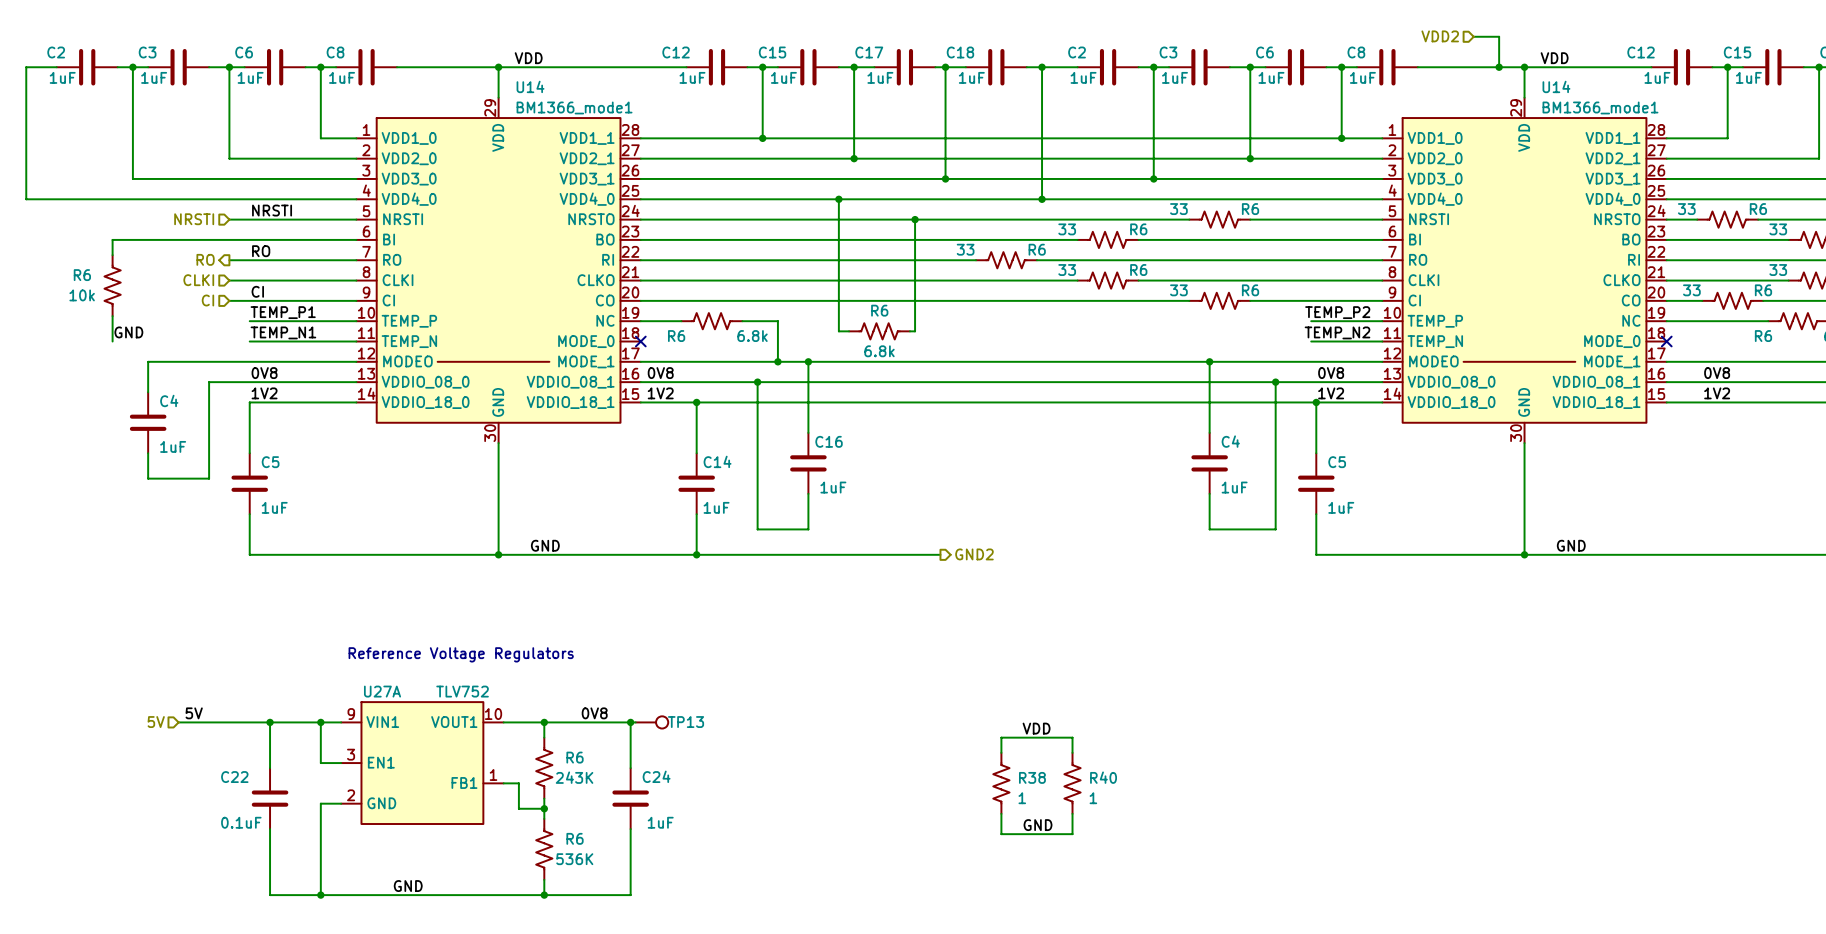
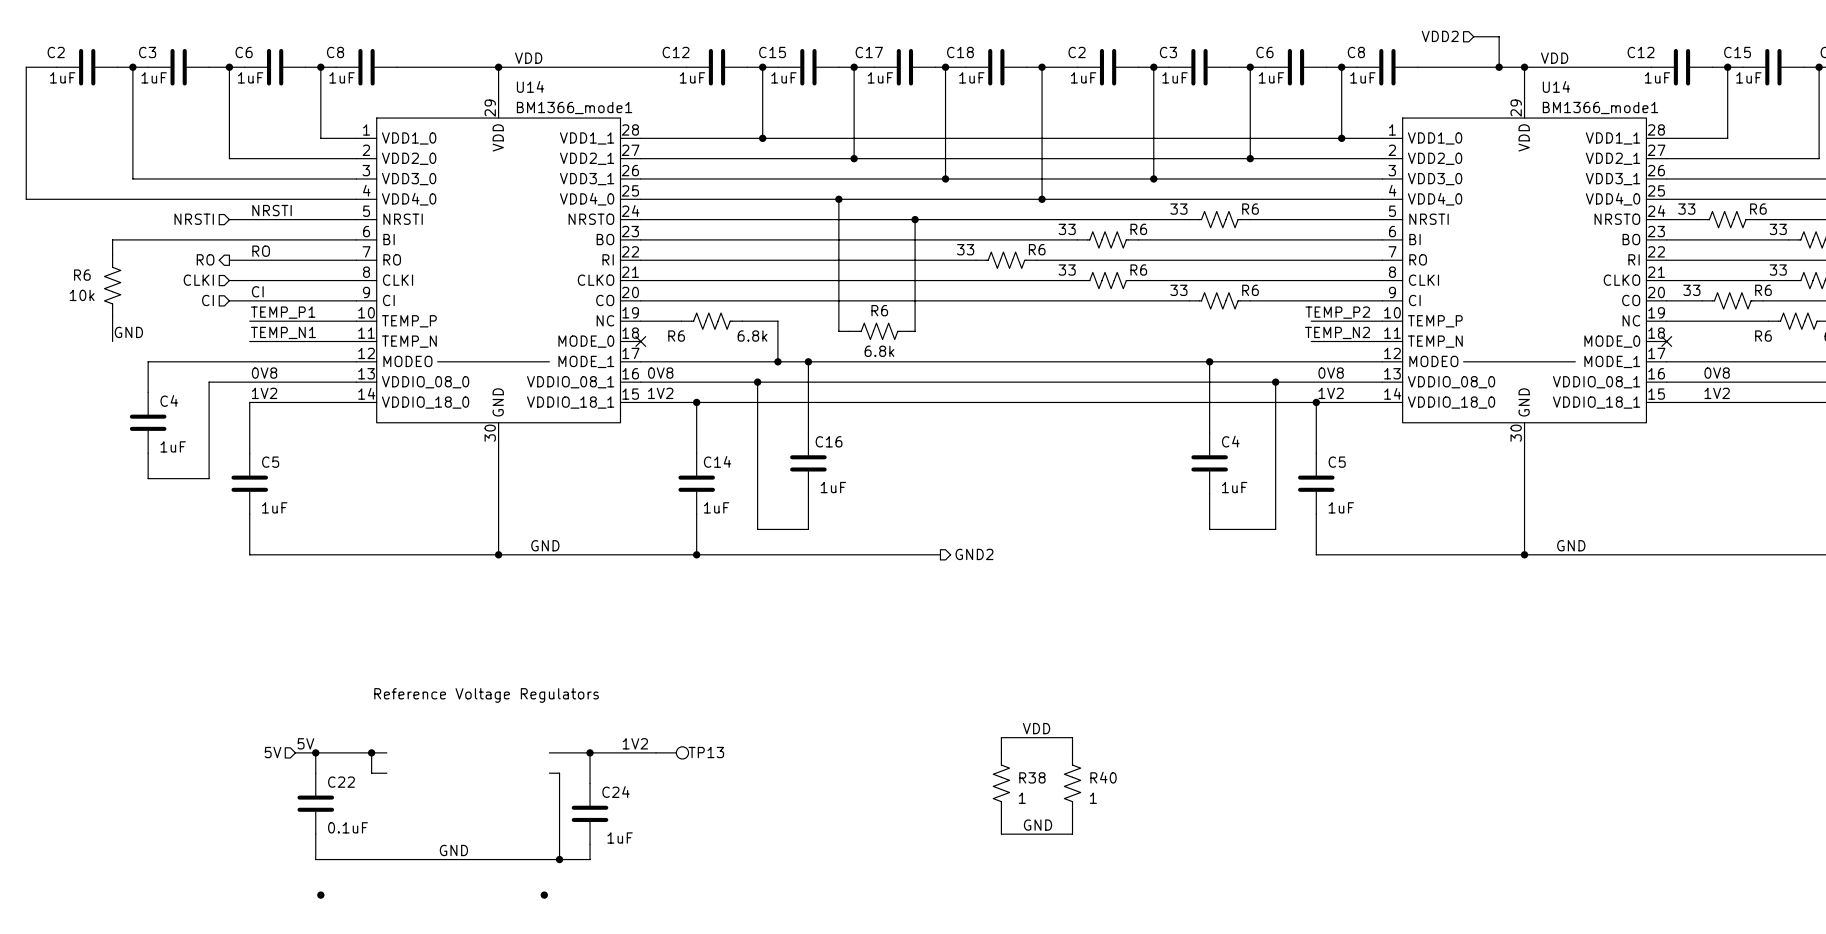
text position: Reference Voltage Regulators (461, 654) -> Reference Voltage Regulators (486, 695)
label position: 5V (194, 713) -> 5V (305, 743)
label: 0V8 (594, 713) -> none
hierarchical label position: 5V (156, 722) -> 5V (273, 752)
wire: (178, 722) (341, 722) -> none
wire: (270, 722) (270, 768) -> none
junction: (270, 722) -> none
wire: (320, 722) (320, 763) (341, 763) -> none
junction: (320, 722) -> none
wire: (503, 722) (635, 722) -> none
wire: (544, 722) (544, 737) -> none
junction: (544, 722) -> none
wire: (630, 722) (630, 768) -> none
junction: (630, 722) -> none
TP13 position: (651, 722) -> (672, 752)
label: none -> 1V2 (635, 743)
wire: none -> (295, 752) (386, 752)
wire: none -> (315, 752) (315, 773)
junction: none -> (315, 752)
junction: none -> (371, 752)
wire: none -> (549, 752) (656, 752)
wire: none -> (590, 752) (590, 783)
junction: none -> (590, 752)
U27A: TLV752 (422, 763) -> none
R6: 243K (544, 768) -> none
wire: none -> (549, 773) (559, 773) (559, 859)
C22 name position: C22 (234, 777) -> C22 (341, 782)
wire: (503, 783) (518, 783) (518, 808) (544, 808) -> none
C22 position: (270, 798) -> (315, 803)
wire: (544, 798) (544, 818) -> none
C24 position: (630, 798) -> (590, 813)
wire: (341, 803) (320, 803) (320, 895) -> none
junction: (544, 808) -> none
C22 value position: 0.1uF (241, 822) -> 0.1uF (348, 827)
wire: (270, 829) (270, 895) (630, 895) (630, 829) -> none
wire: none -> (315, 834) (315, 859) (590, 859) (590, 844)
R6: 536K (544, 849) -> none
junction: none -> (559, 859)
wire: (544, 879) (544, 895) -> none
label position: GND (408, 886) -> GND (453, 850)

